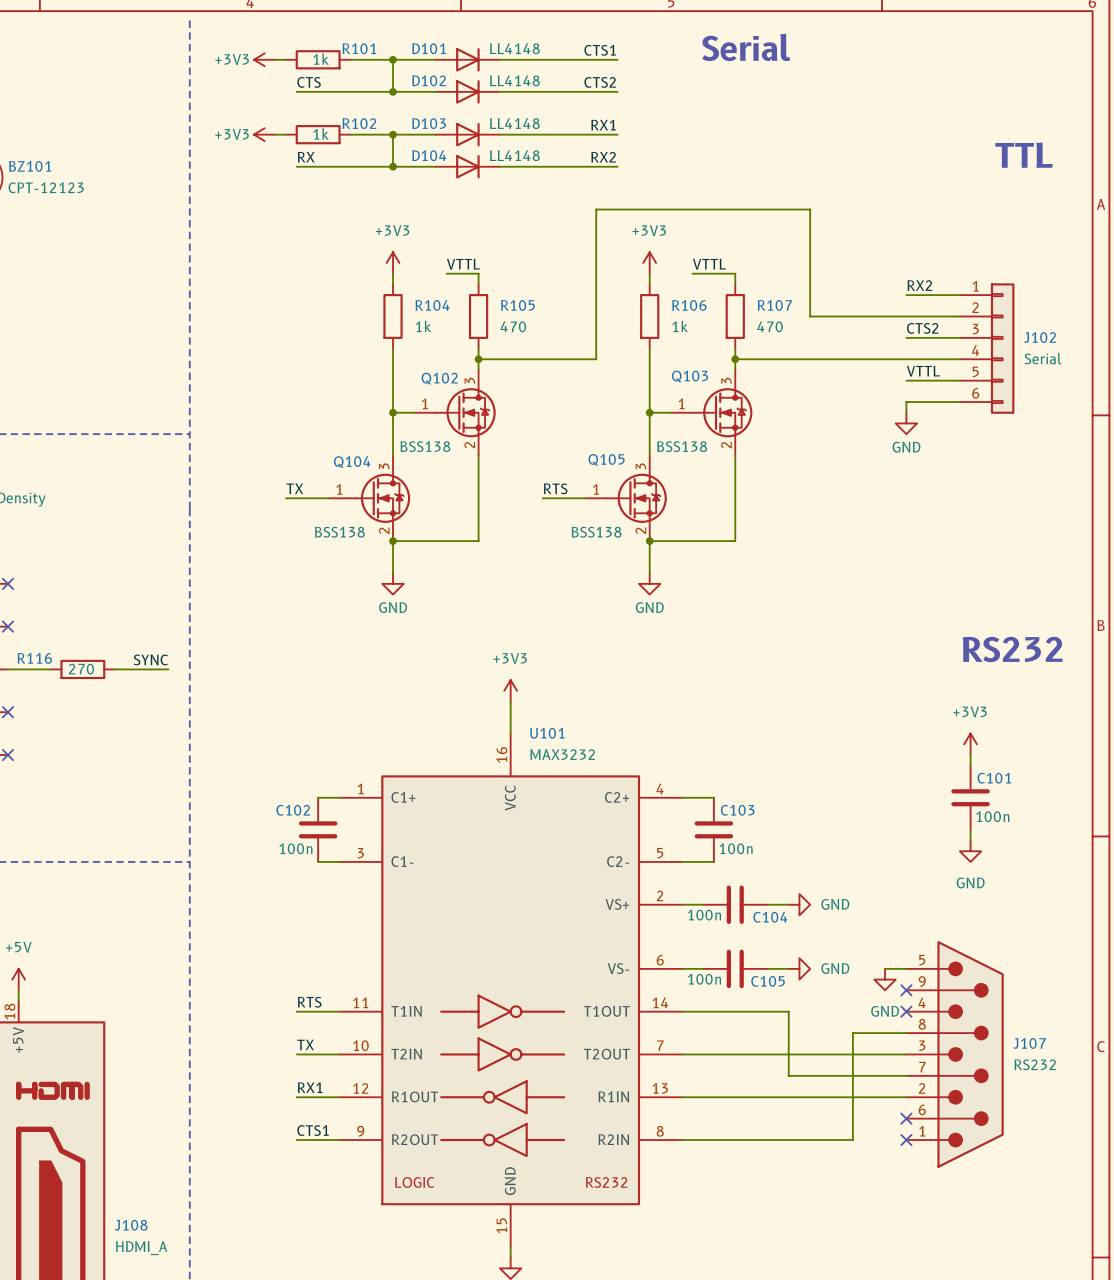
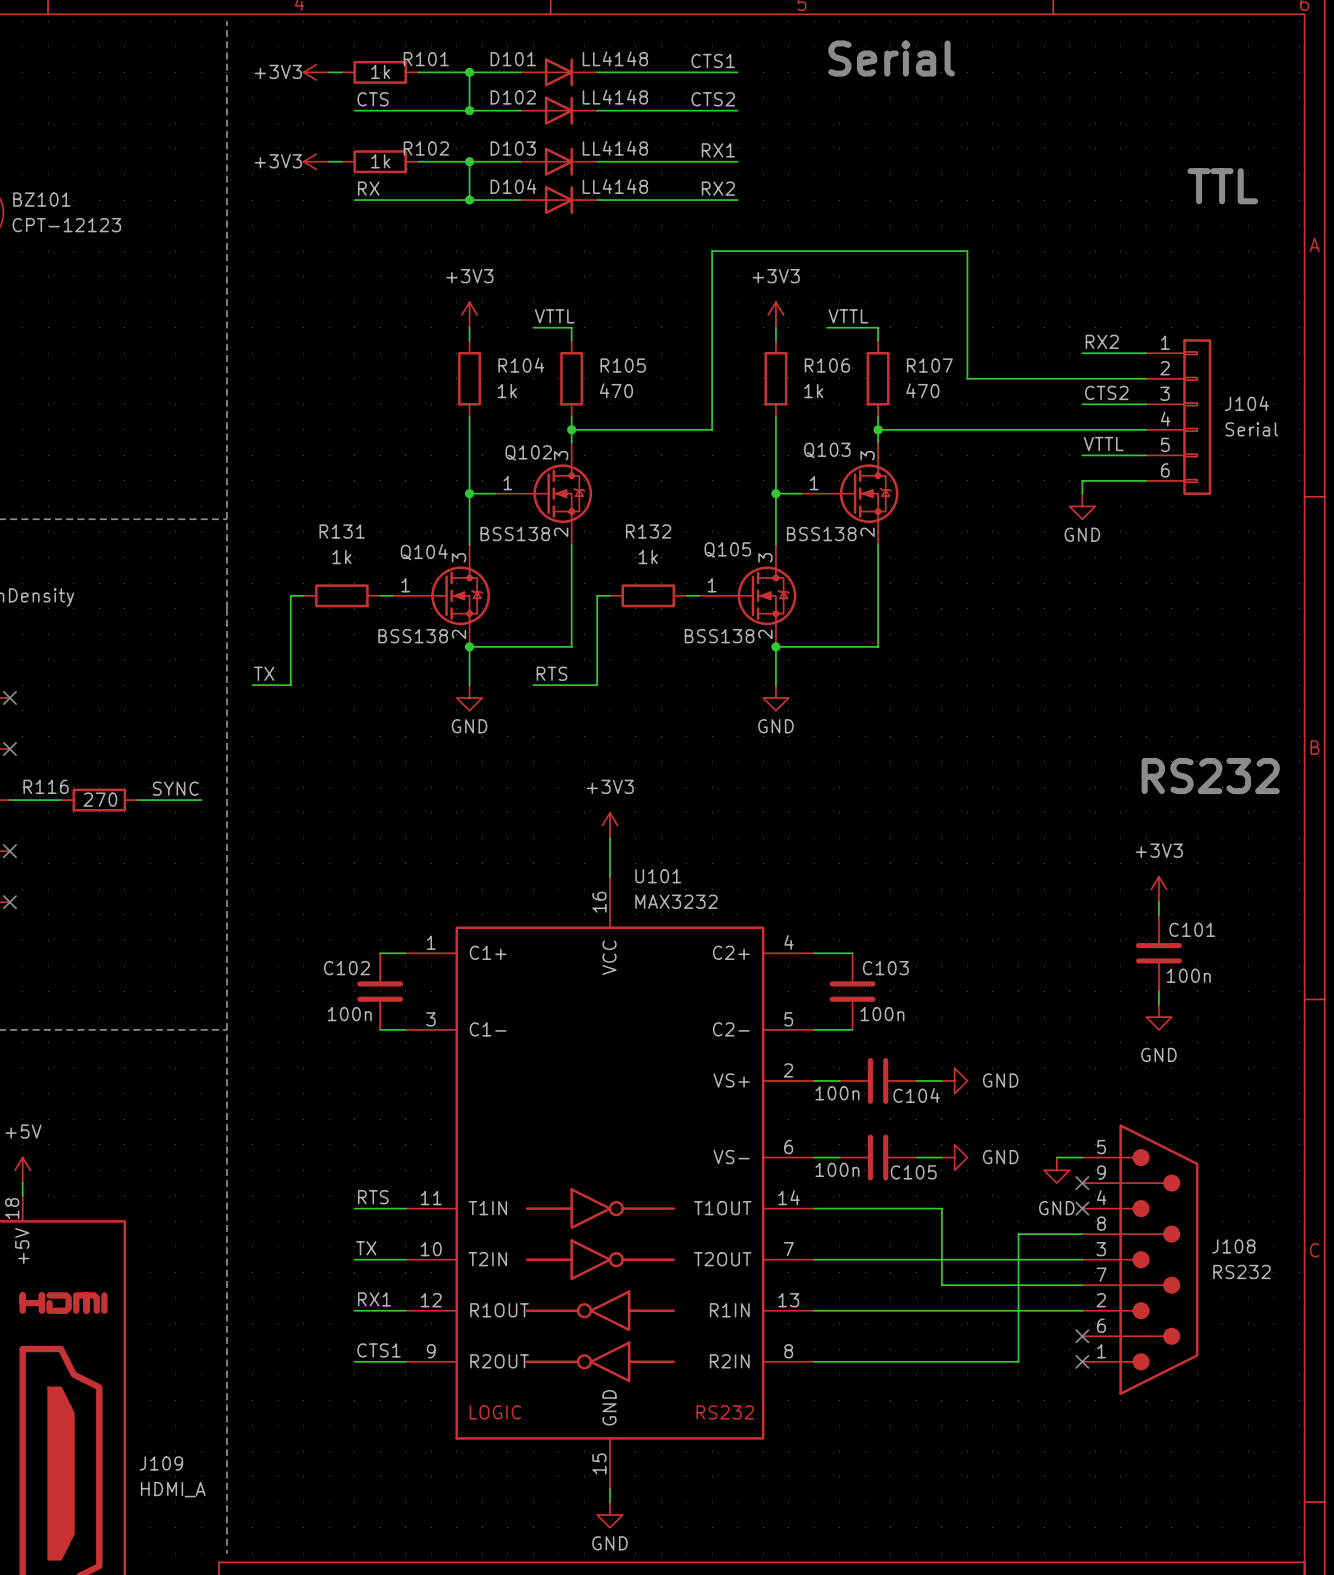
J102 name: J102 (1040, 337) -> J104 (1246, 403)
label position: TX (294, 488) -> TX (264, 673)
label position: RTS (555, 488) -> RTS (552, 673)
wire: none -> (303, 595) (290, 595) (290, 685) (252, 685)
wire: (286, 498) (318, 498) -> none
R131: none -> 1k (341, 595)
wire: none -> (609, 595) (597, 595) (597, 685) (533, 685)
wire: (542, 498) (574, 498) -> none
R132: none -> 1k (648, 595)
J107 name: J107 (1029, 1043) -> J108 (1233, 1246)
J108 name: J108 (131, 1225) -> J109 (161, 1463)

